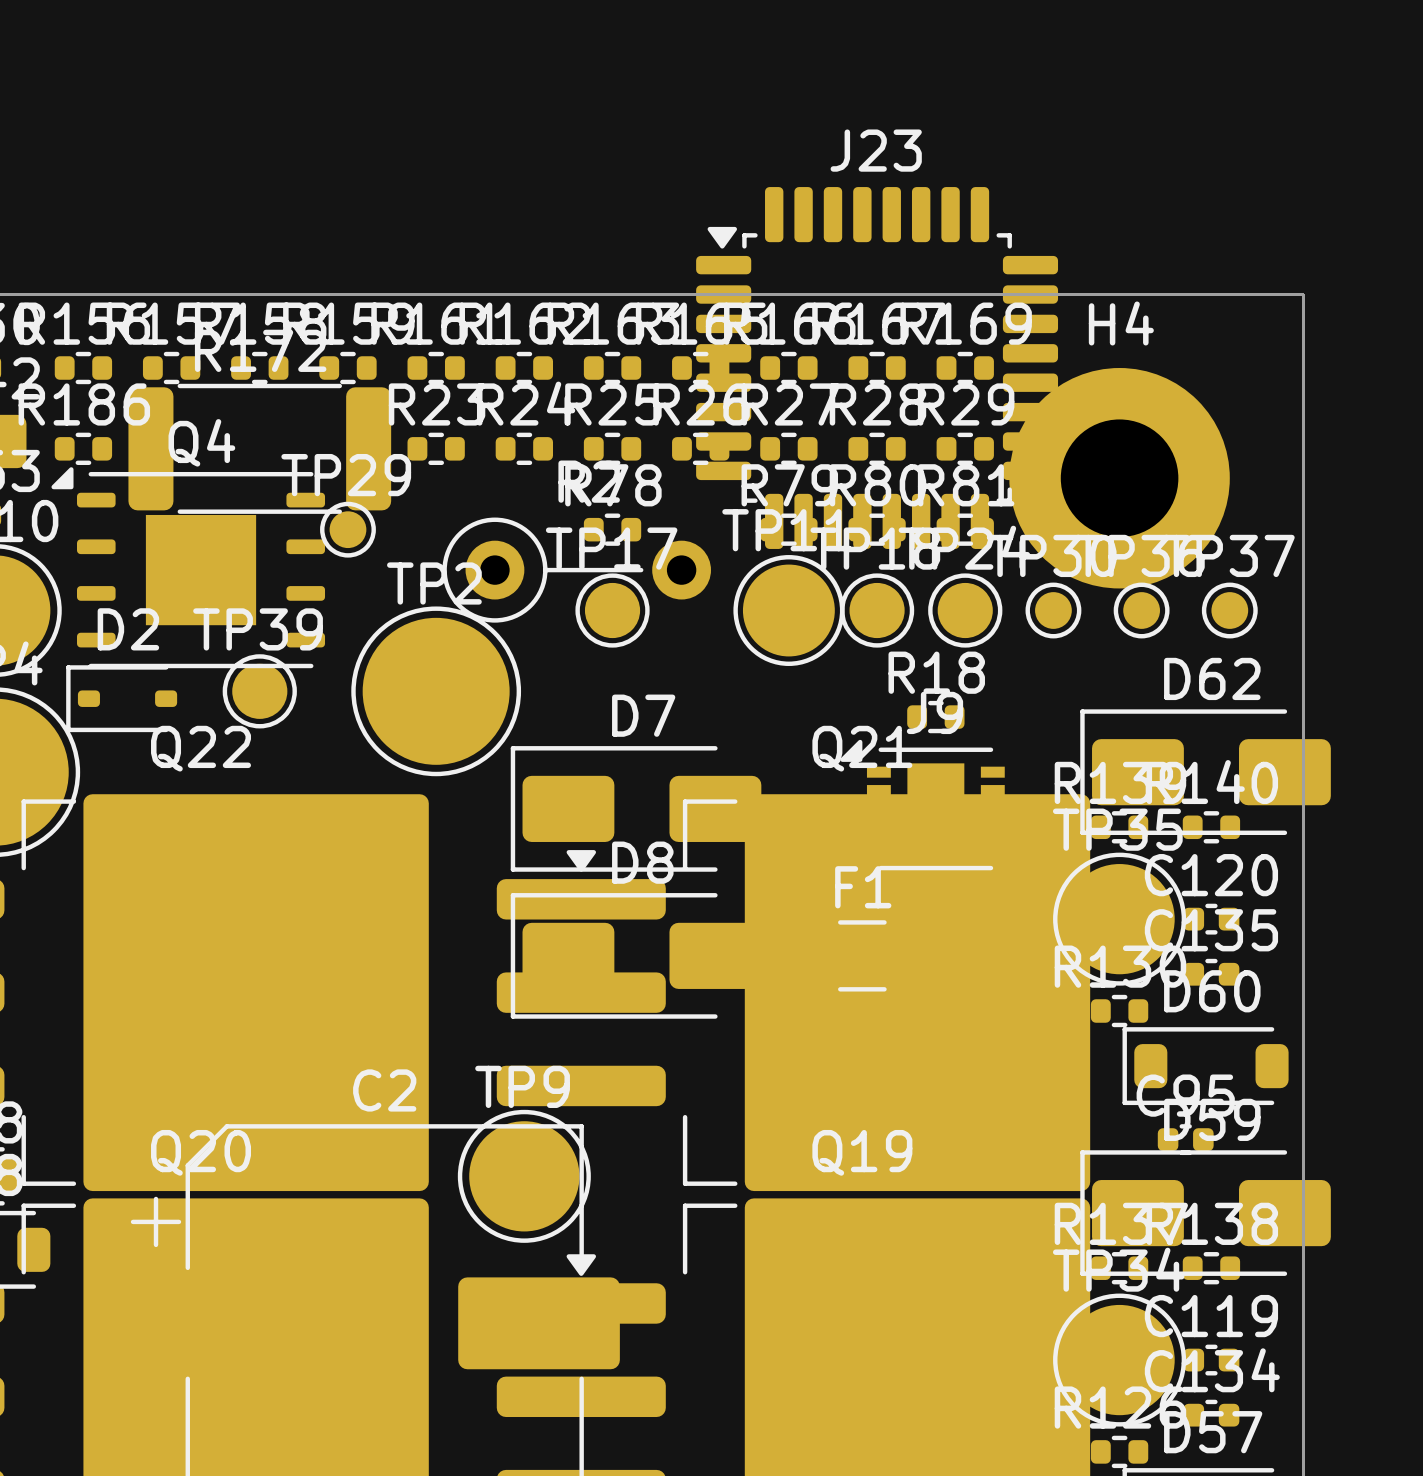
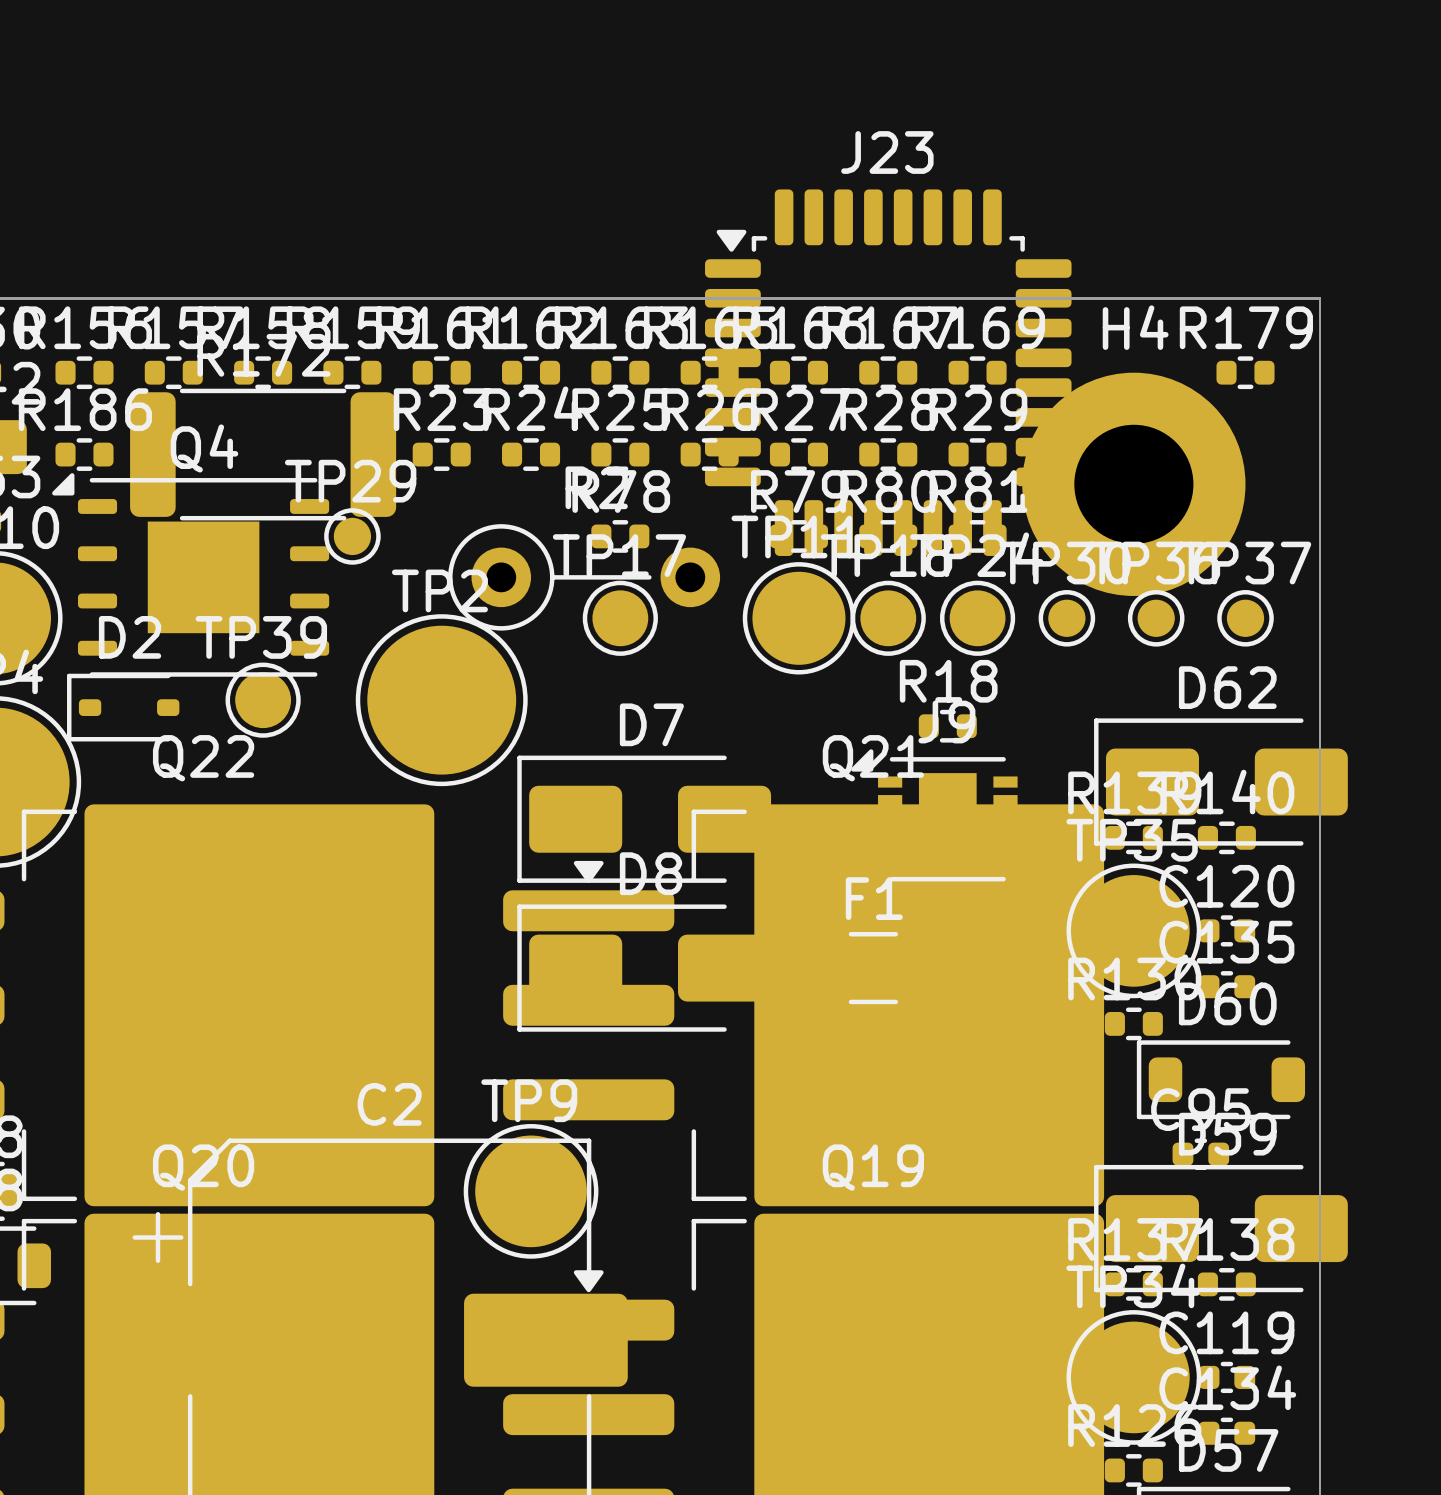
R179: none -> (1245, 372)

